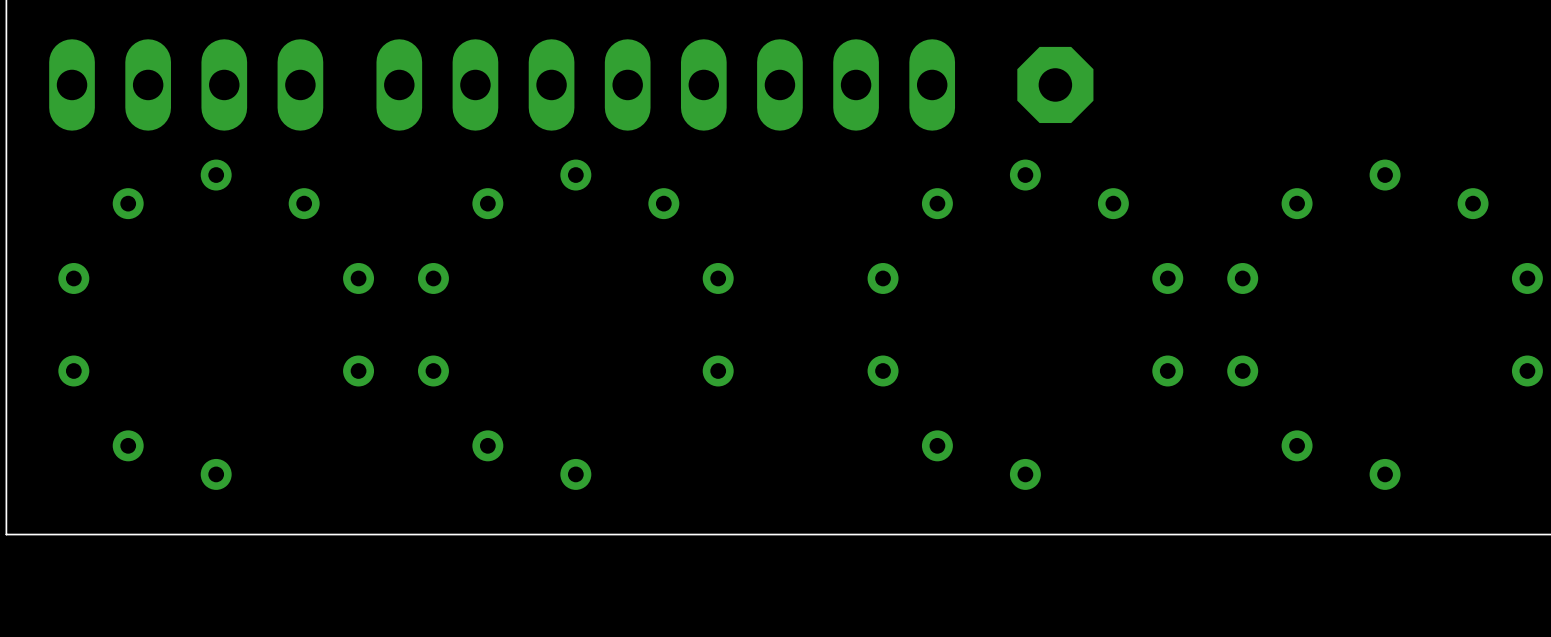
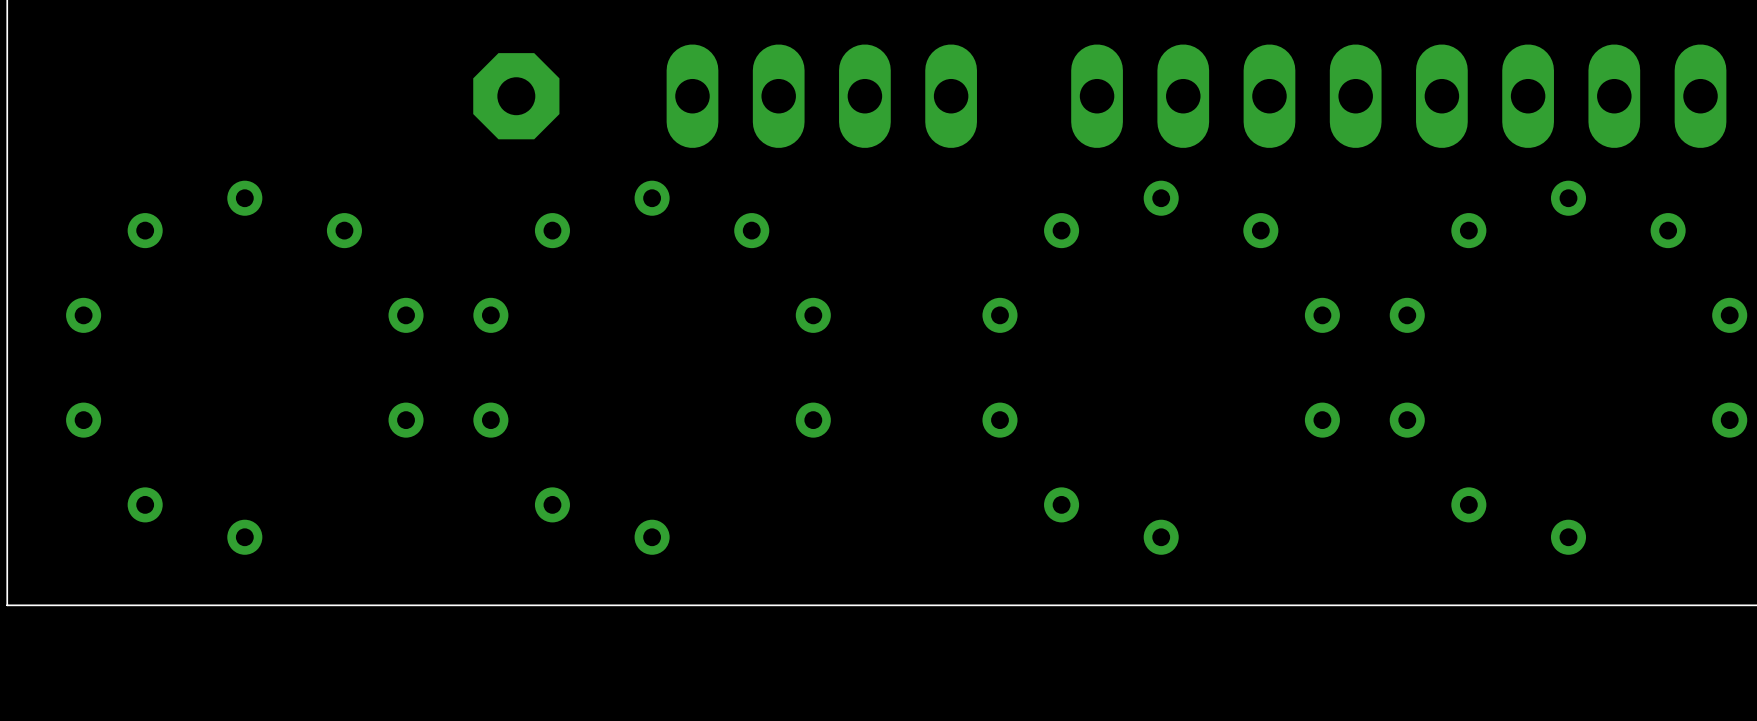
part position: (186, 84) -> (821, 96)
part position: (665, 84) -> (1398, 96)
part position: (1055, 84) -> (516, 96)

